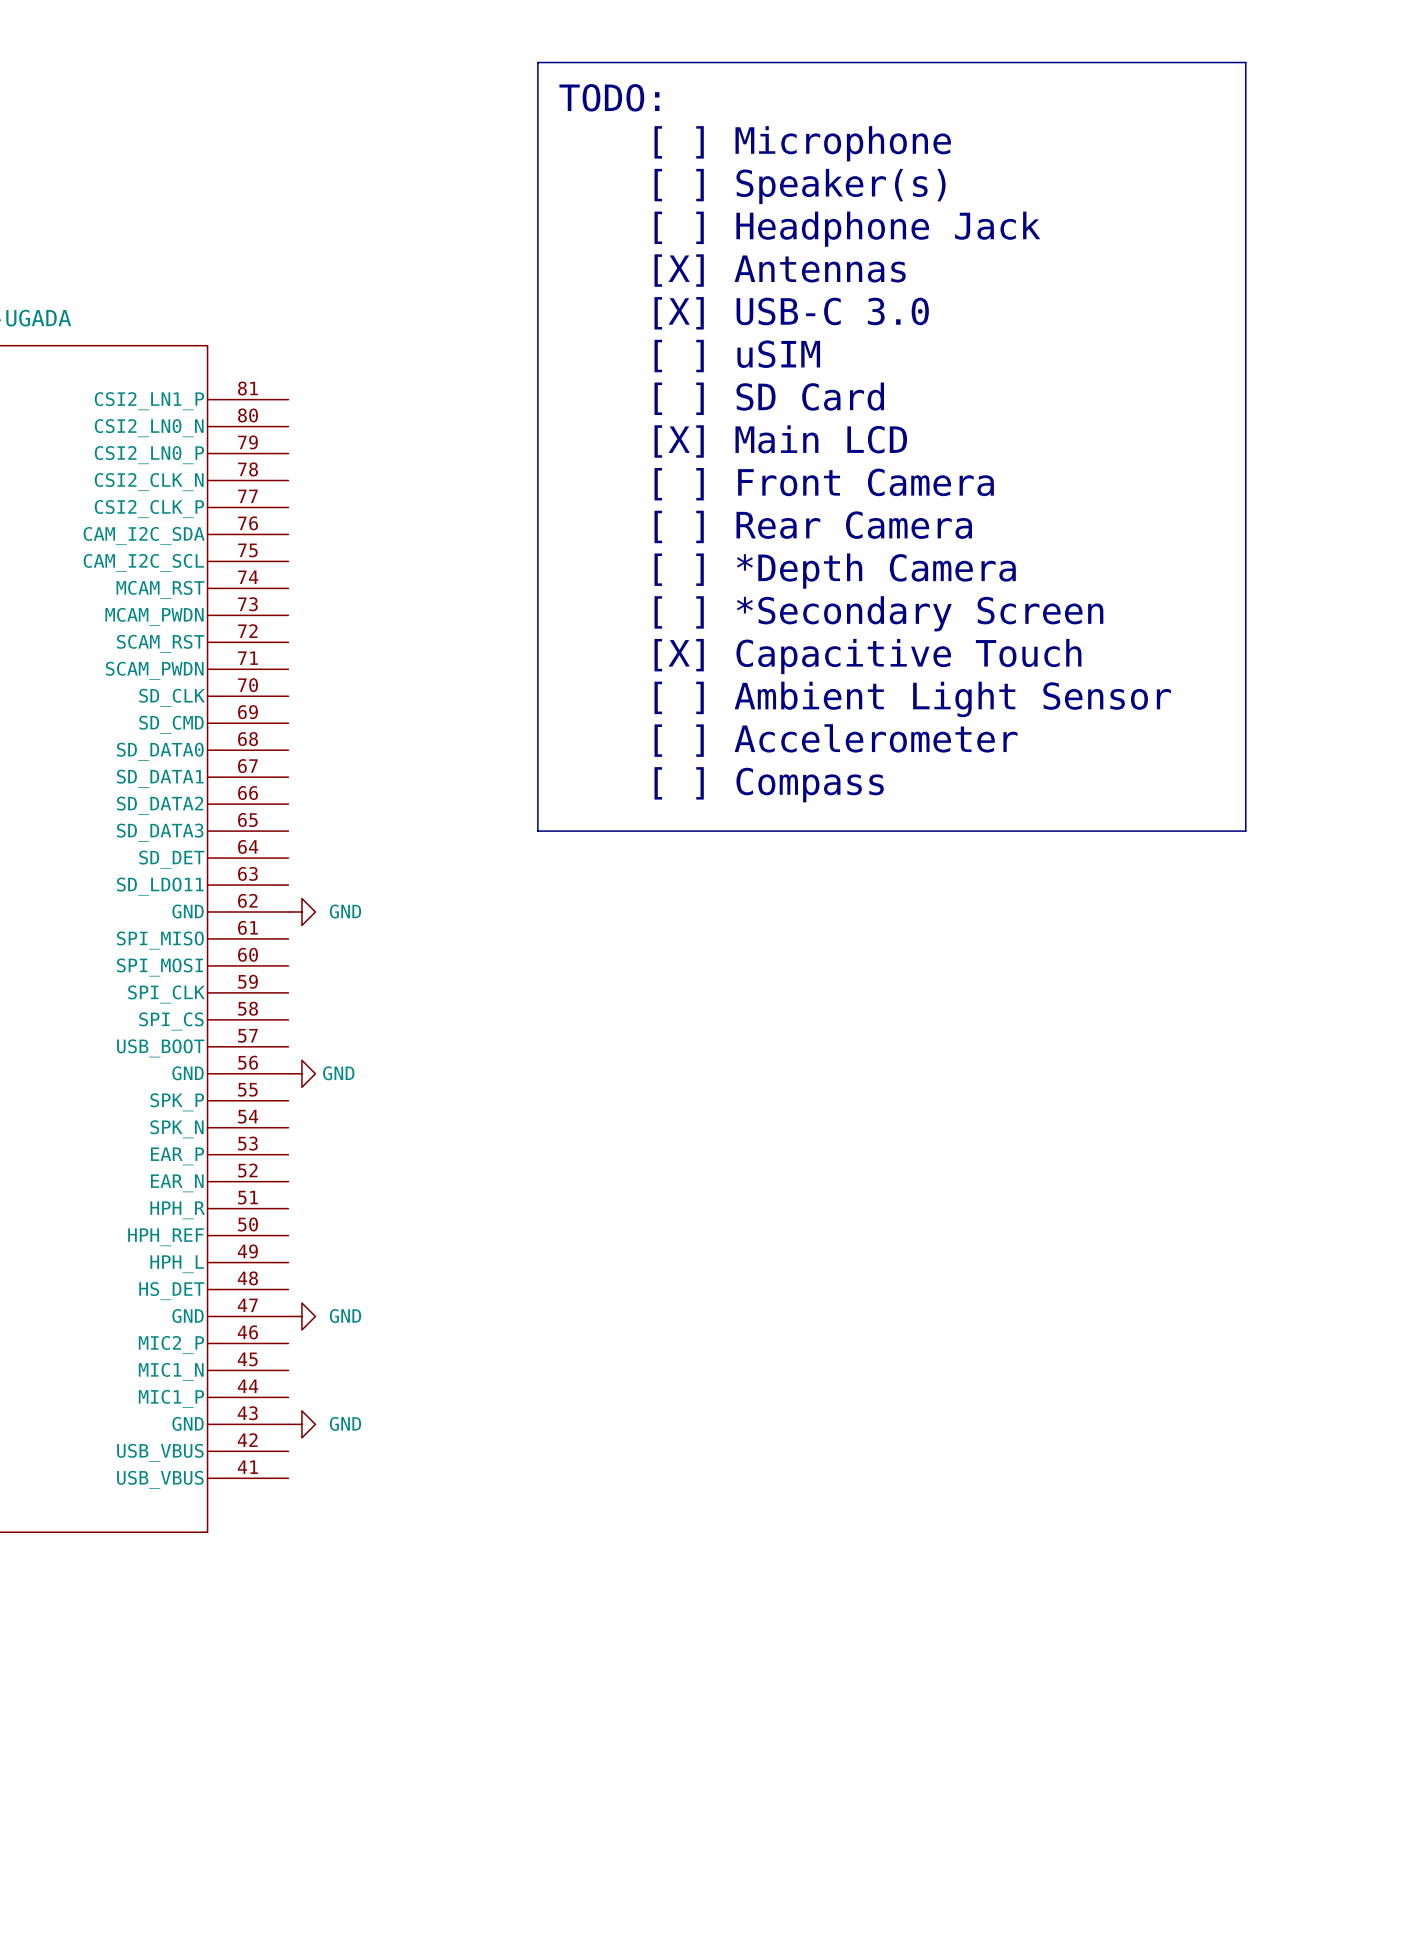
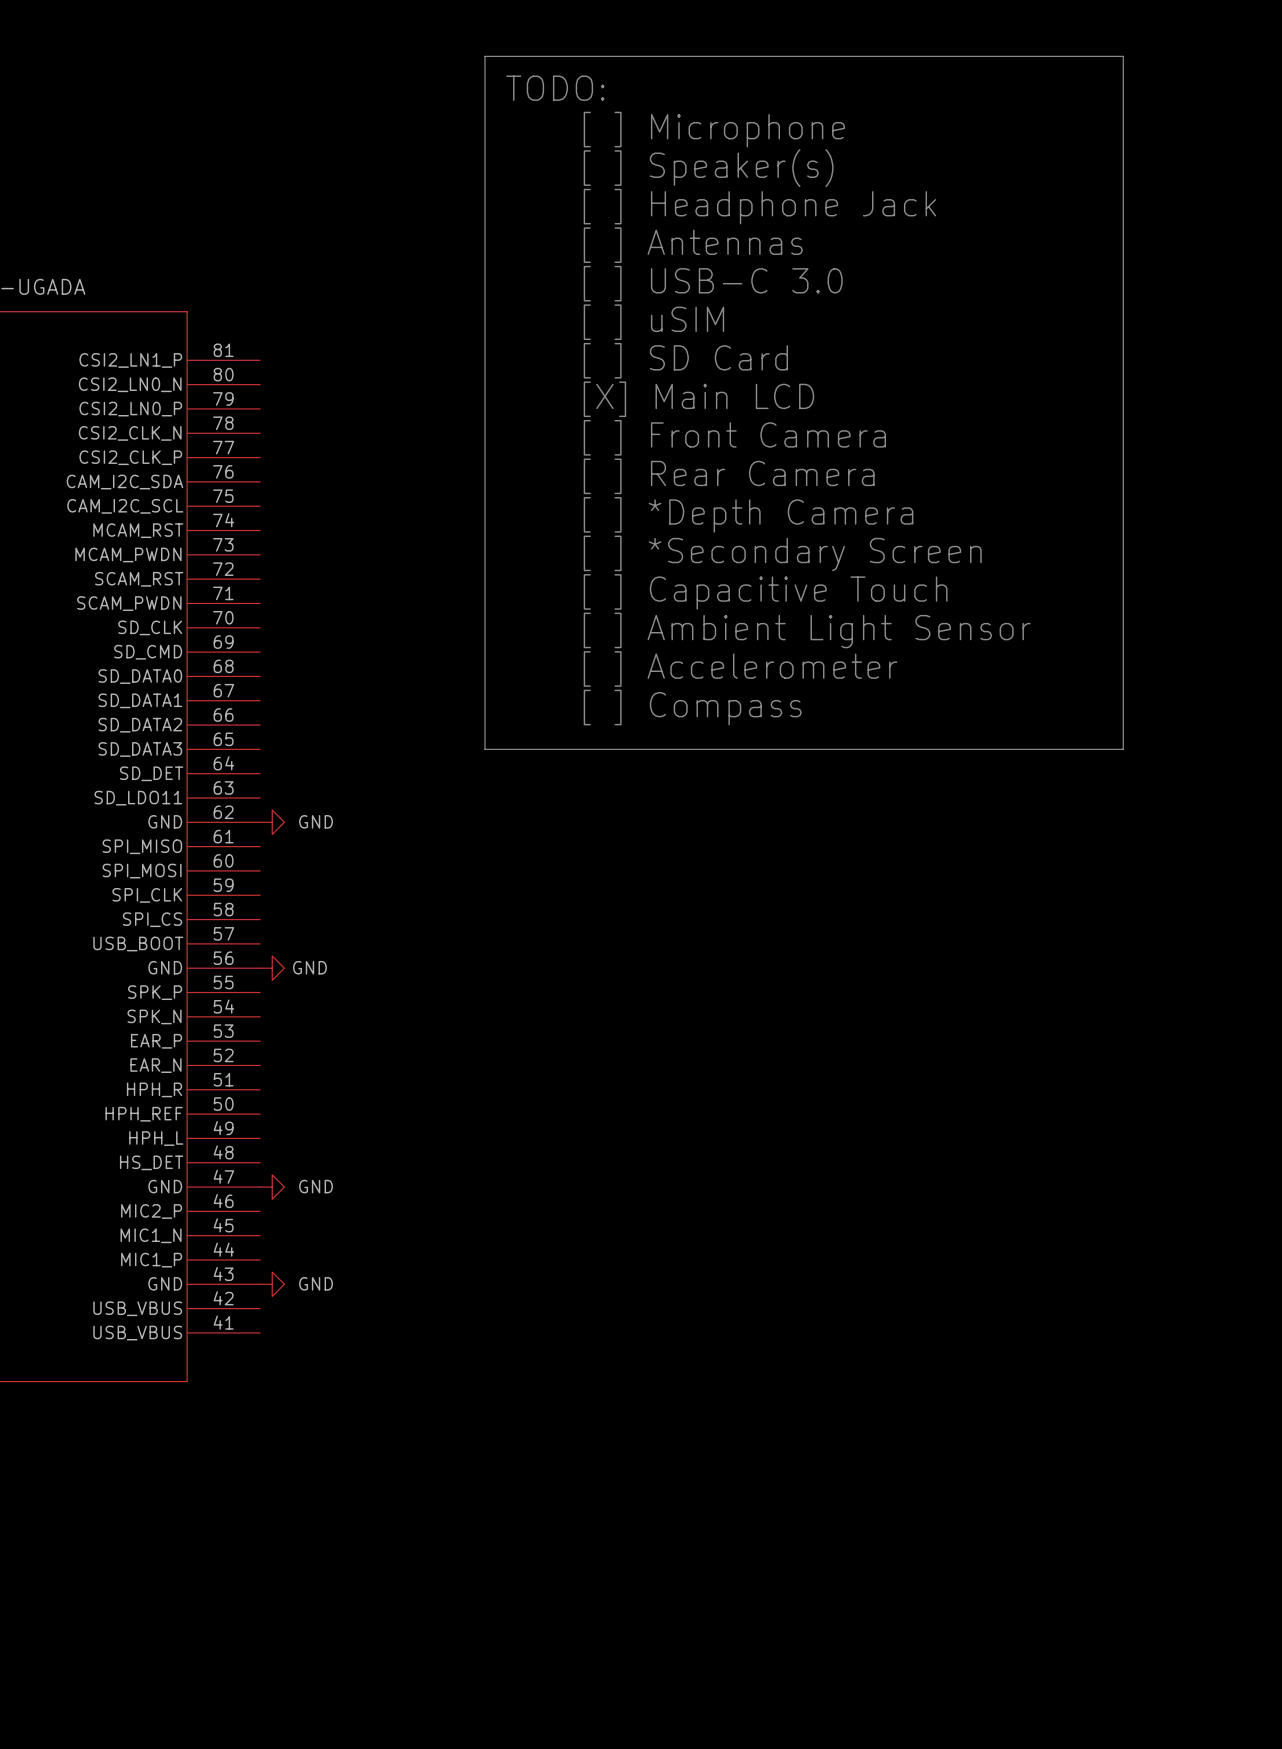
text: [X] Antennas (780, 270) -> [ ] Antennas (693, 245)
text: [X] USB-C 3.0 (791, 313) -> [ ] USB-C 3.0 (713, 283)
text: [X] Capacitive Touch (867, 656) -> [ ] Capacitive Touch (765, 591)

